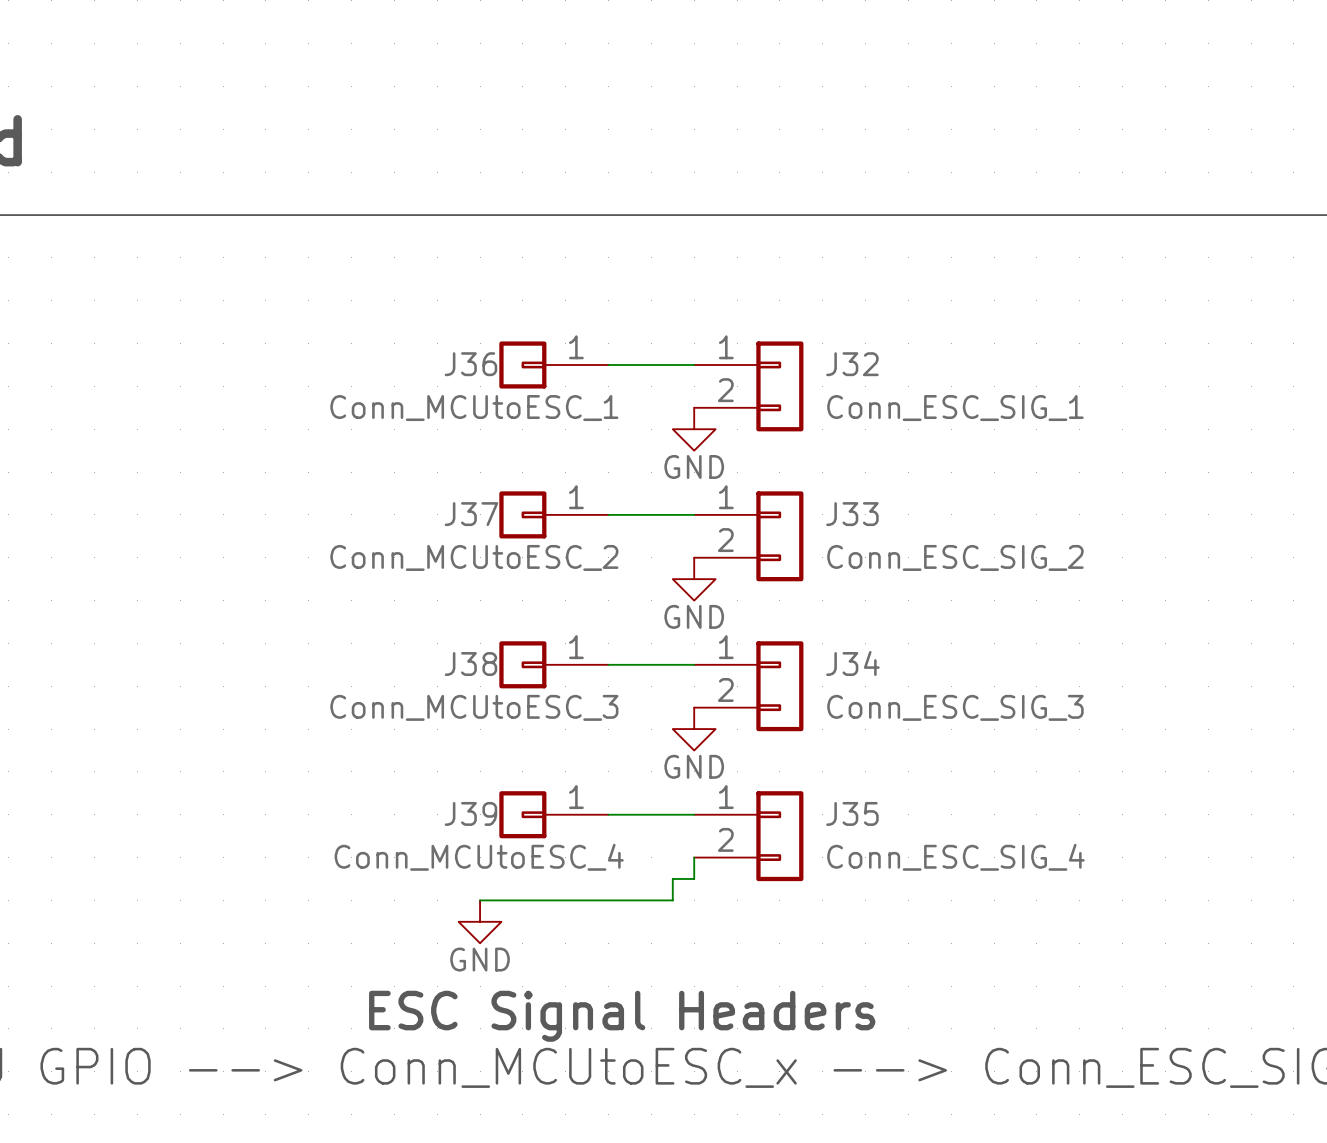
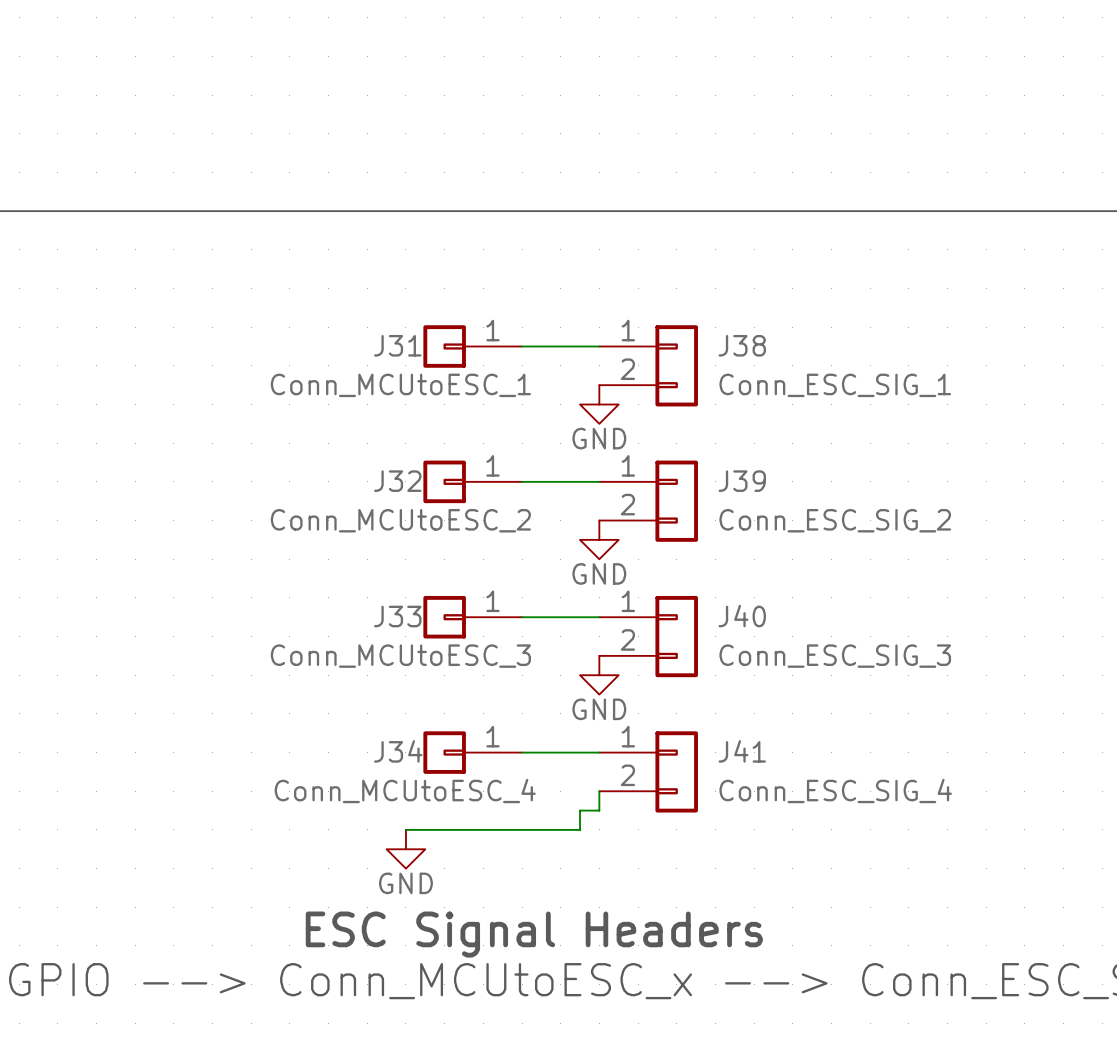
J36 name: J36 (470, 364) -> J31 (397, 345)
J32 name: J32 (852, 364) -> J38 (742, 345)
J37 name: J37 (471, 514) -> J32 (397, 481)
J33 name: J33 (852, 514) -> J39 (742, 481)
J34 name: J34 (852, 663) -> J40 (742, 616)
J38 name: J38 (470, 664) -> J33 (397, 616)
J39 name: J39 (470, 813) -> J34 (398, 751)
J35 name: J35 (852, 813) -> J41 (742, 751)

